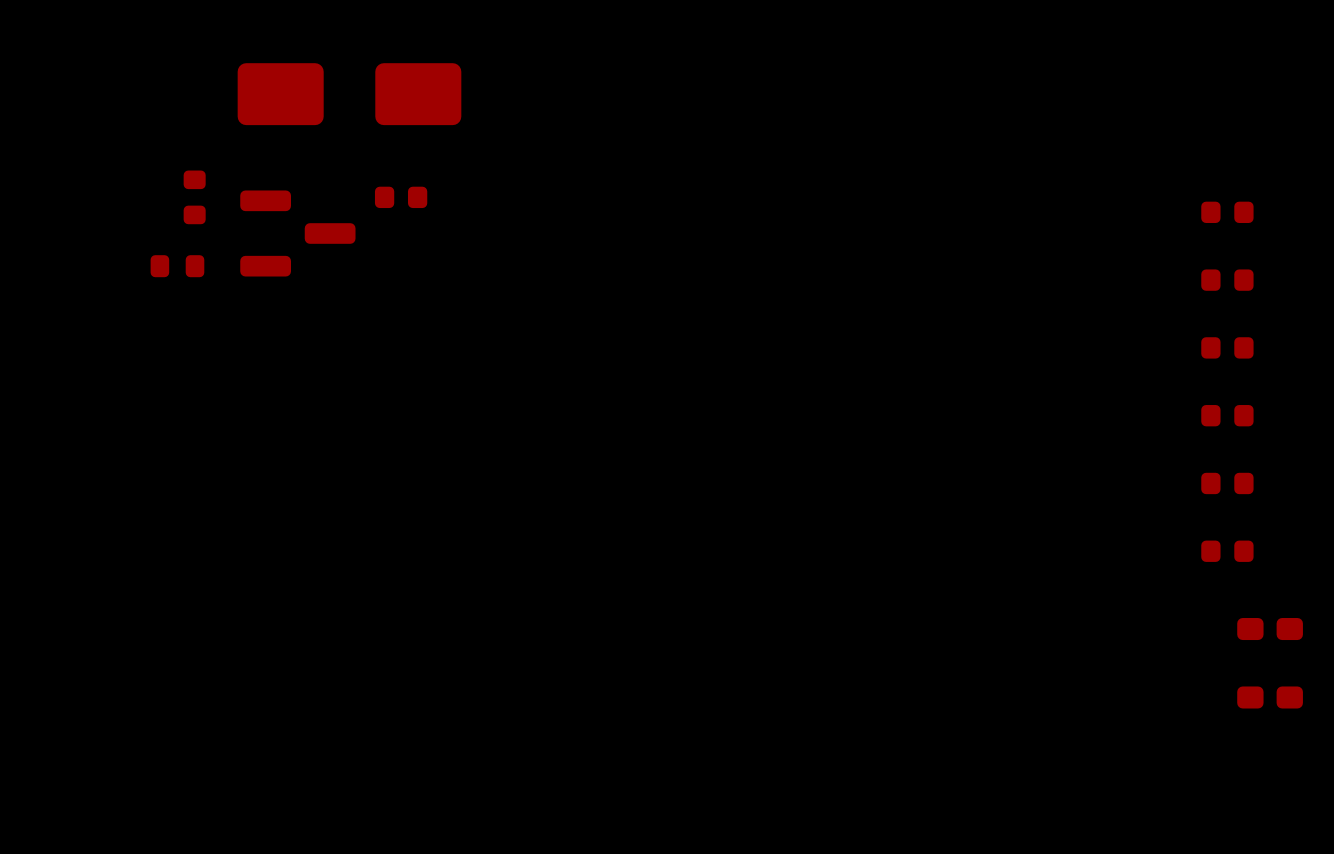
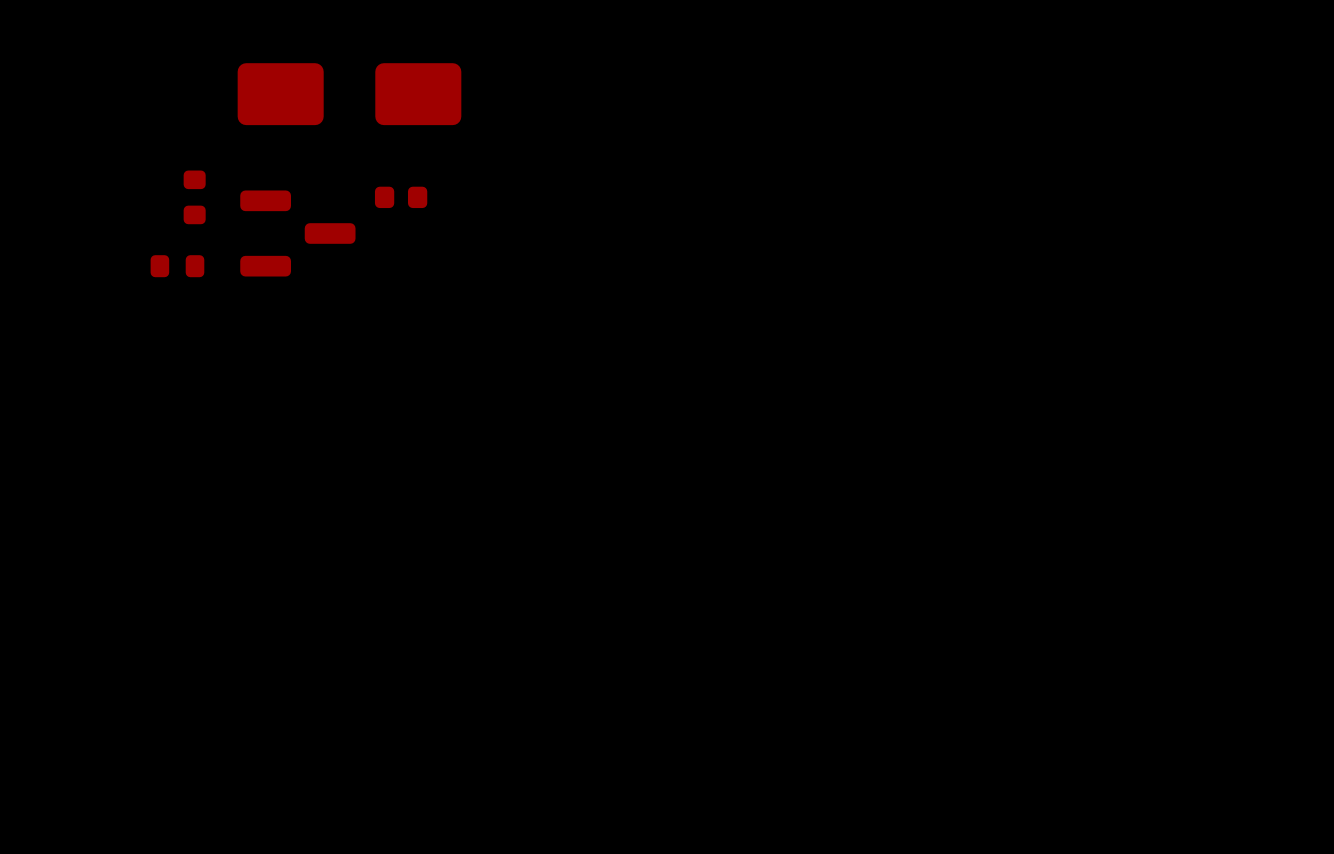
part: (1227, 212) -> none
part: (1227, 280) -> none
part: (1227, 347) -> none
part: (1227, 415) -> none
part: (1227, 483) -> none
part: (1227, 551) -> none
part: (1270, 629) -> none
part: (1270, 697) -> none

